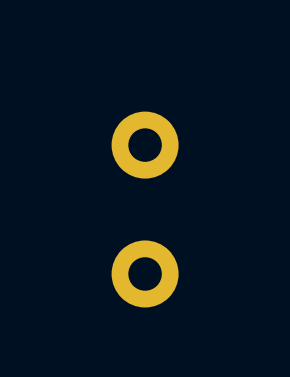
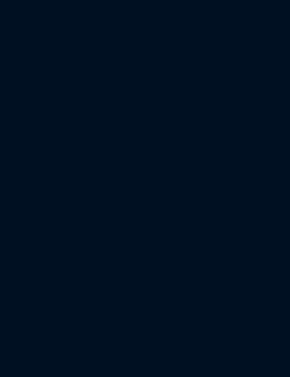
part: (145, 209) -> none

